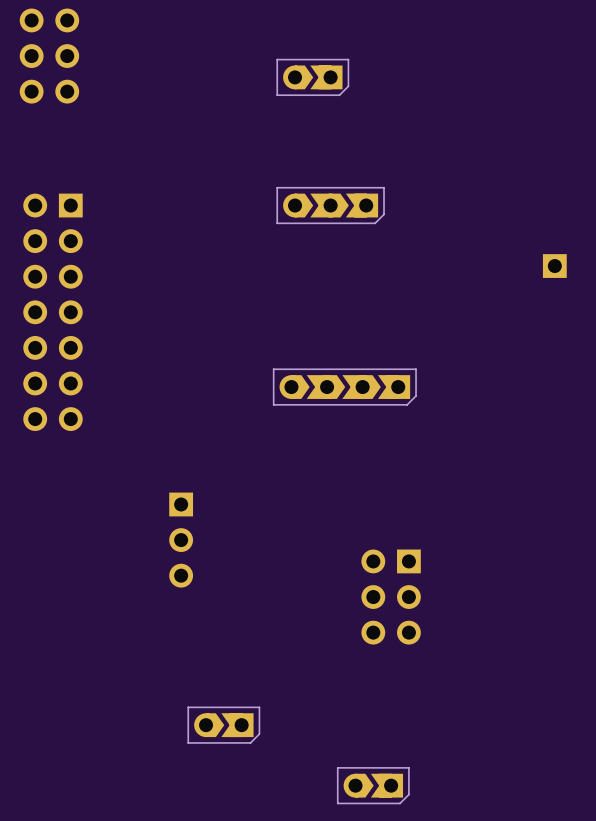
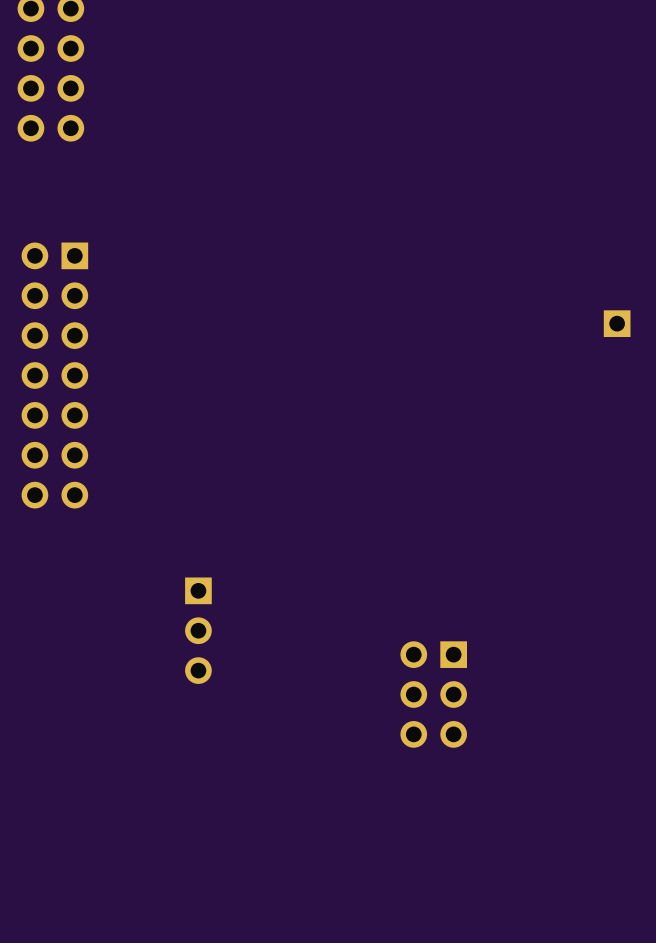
part: (312, 77) -> none
part: (330, 205) -> none
part: (344, 387) -> none
part: (223, 725) -> none
part: (373, 785) -> none

